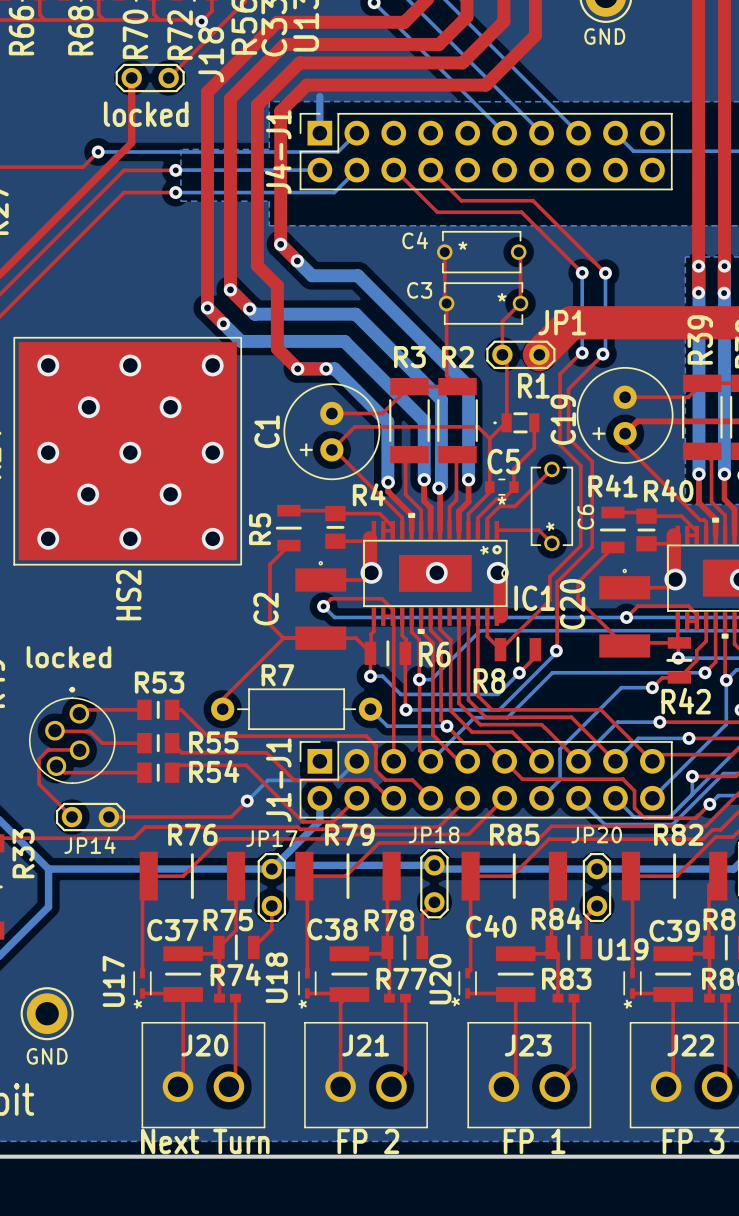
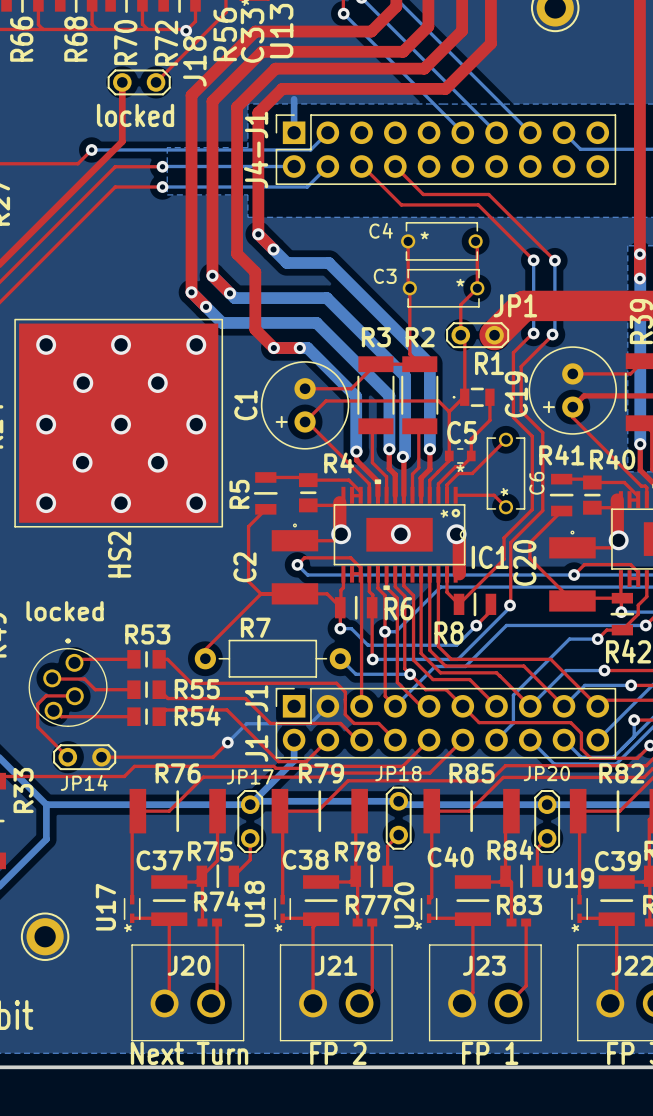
part value: GND (604, 36) -> none
part value: GND (47, 1056) -> none

